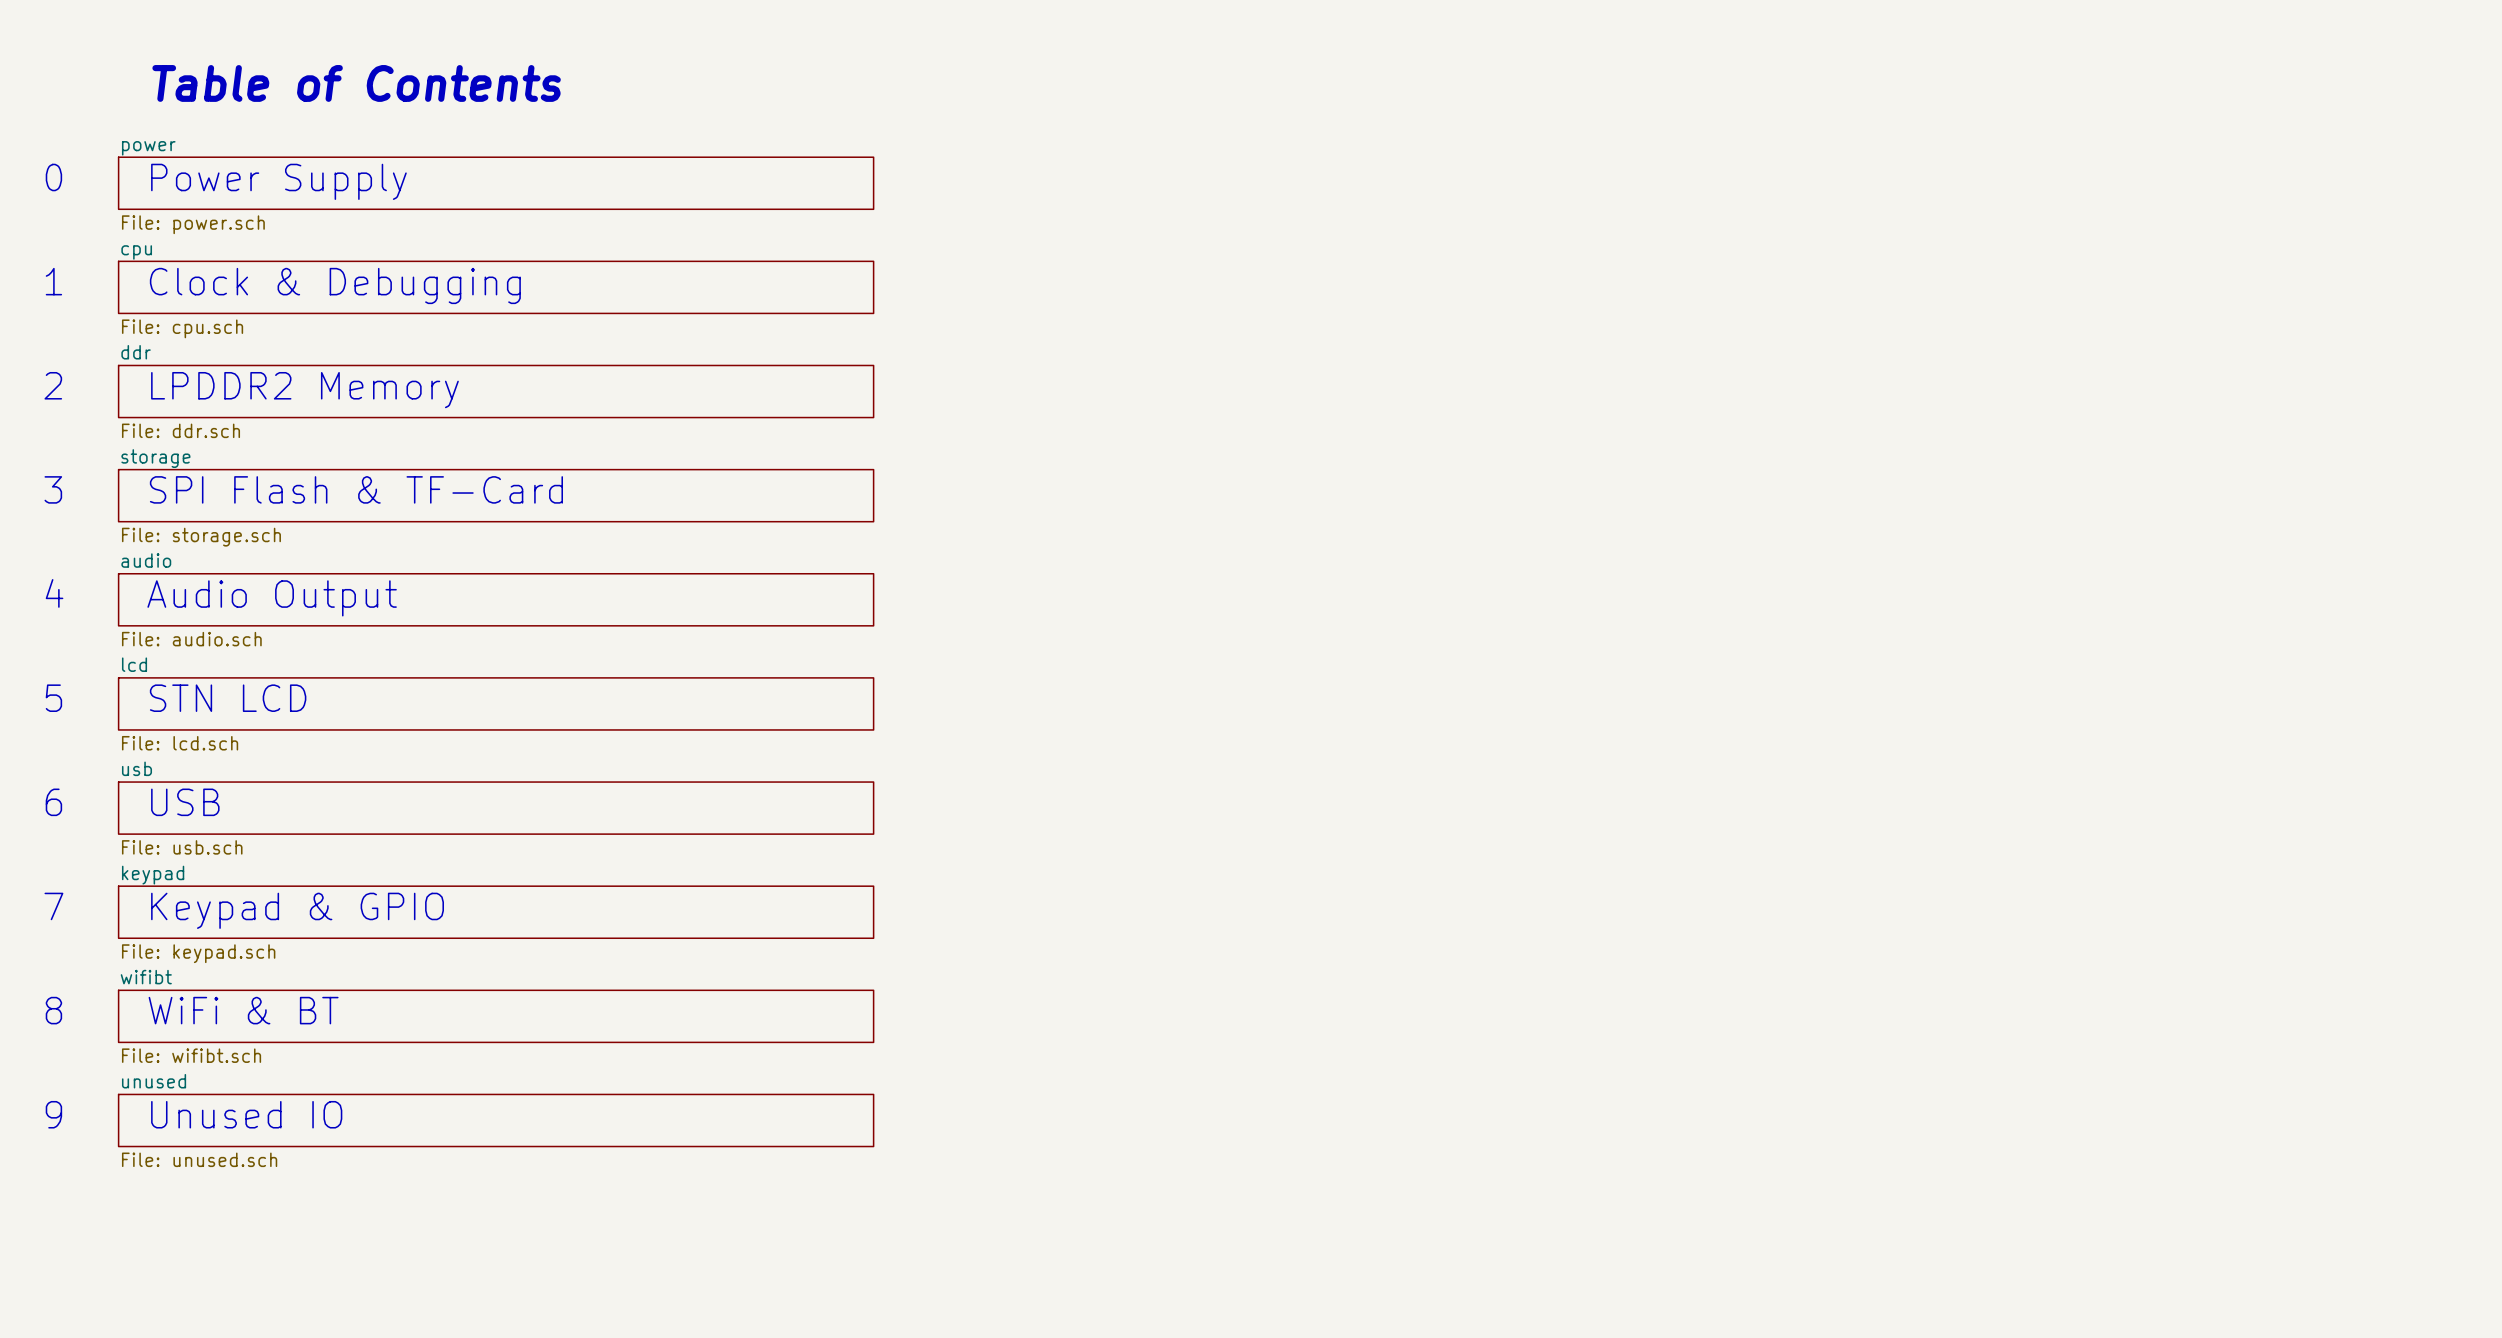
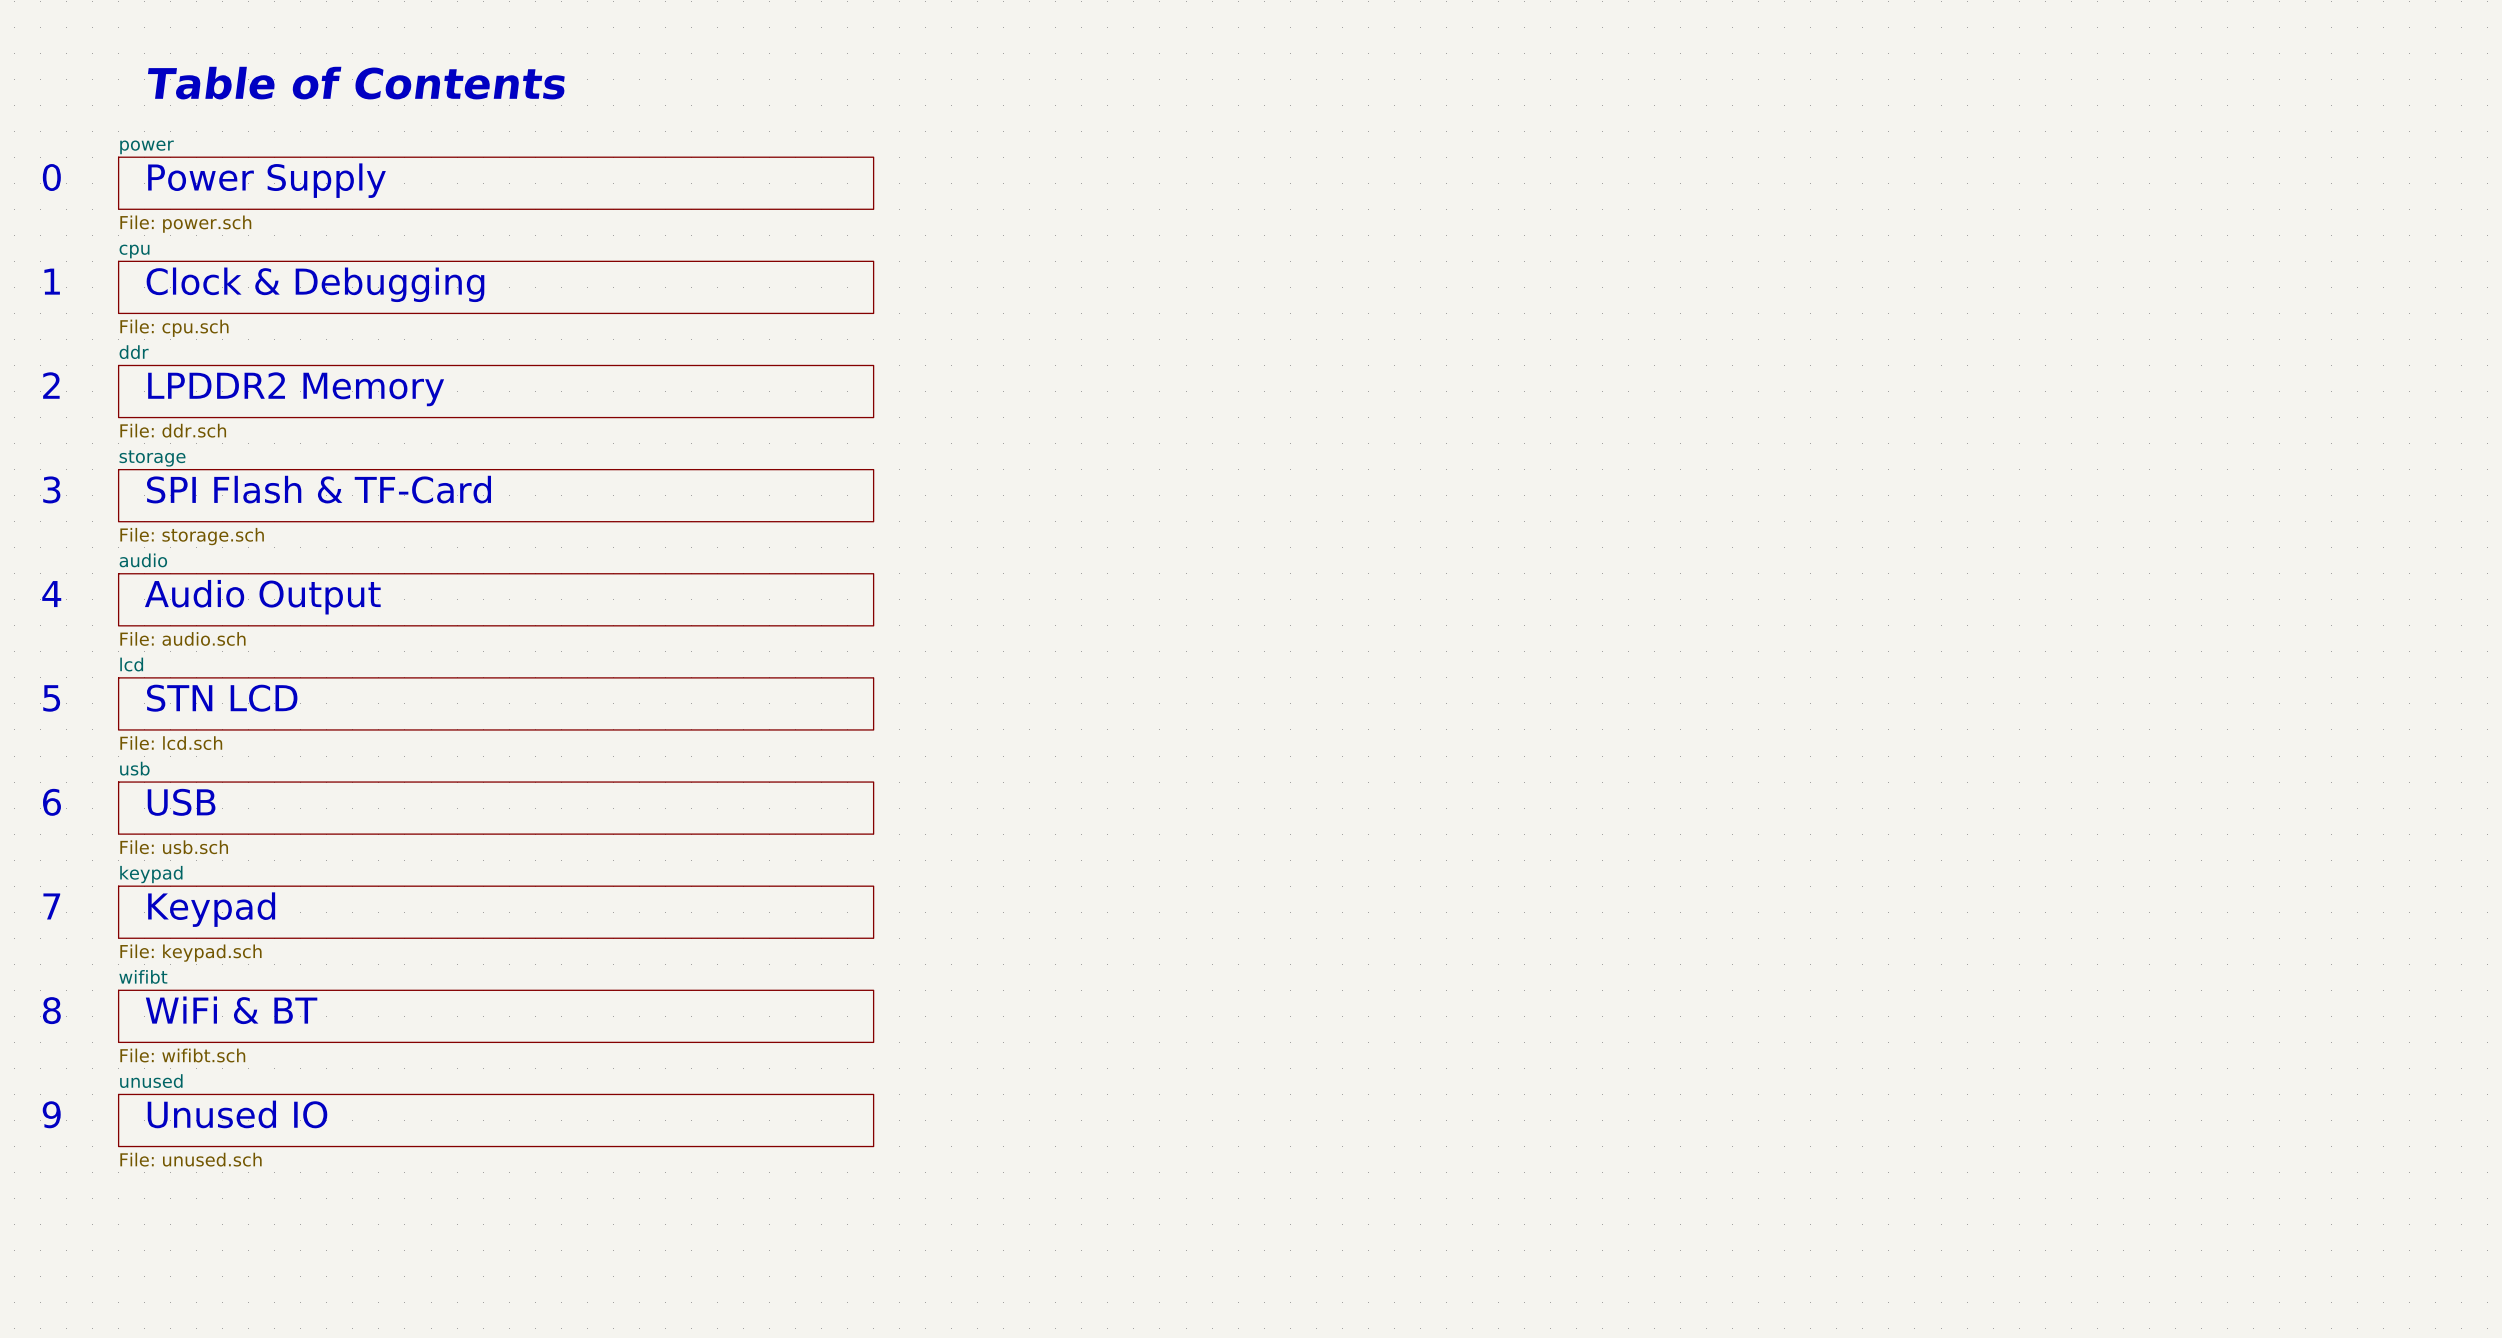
text: Keypad & GPIO (297, 910) -> Keypad (211, 909)

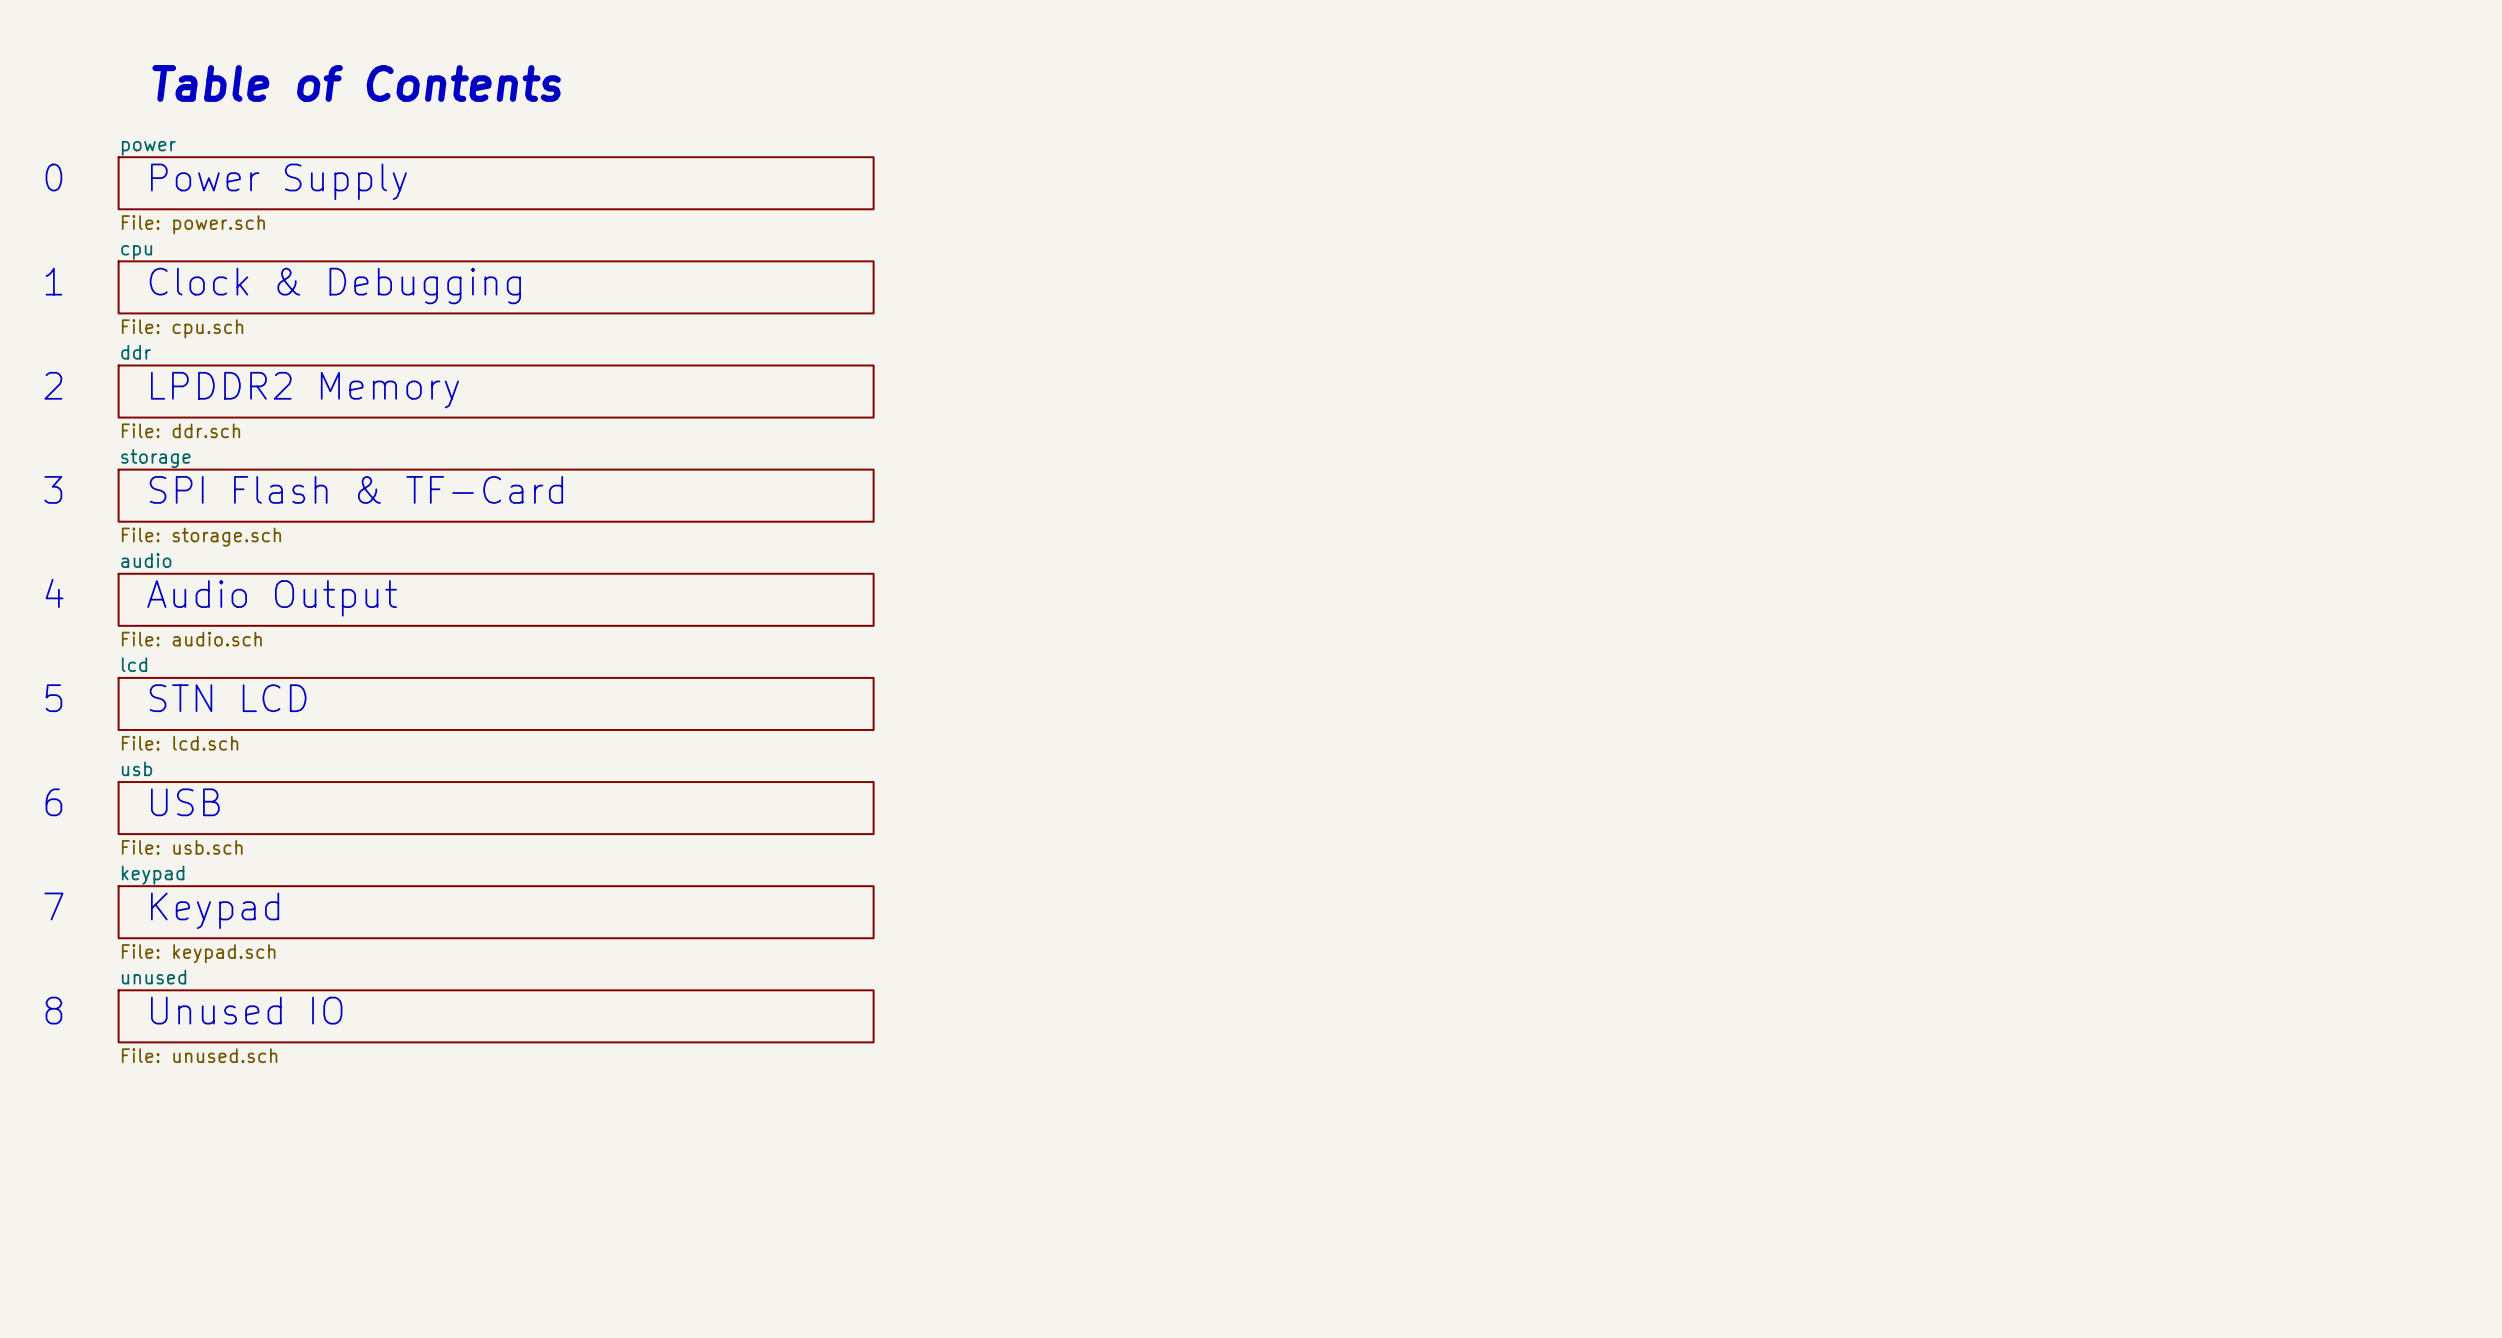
sheet wifibt name: wifibt (143, 976) -> unused (154, 977)
text: WiFi & BT (231, 1010) -> Unused IO (246, 1010)
sheet wifibt value: File: wifibt.sch (182, 1055) -> File: unused.sch (199, 1055)
text: 9 (51, 1114) -> none
text: Unused IO (237, 1114) -> none
sheet unused: File: unused.sch (496, 1120) -> none

